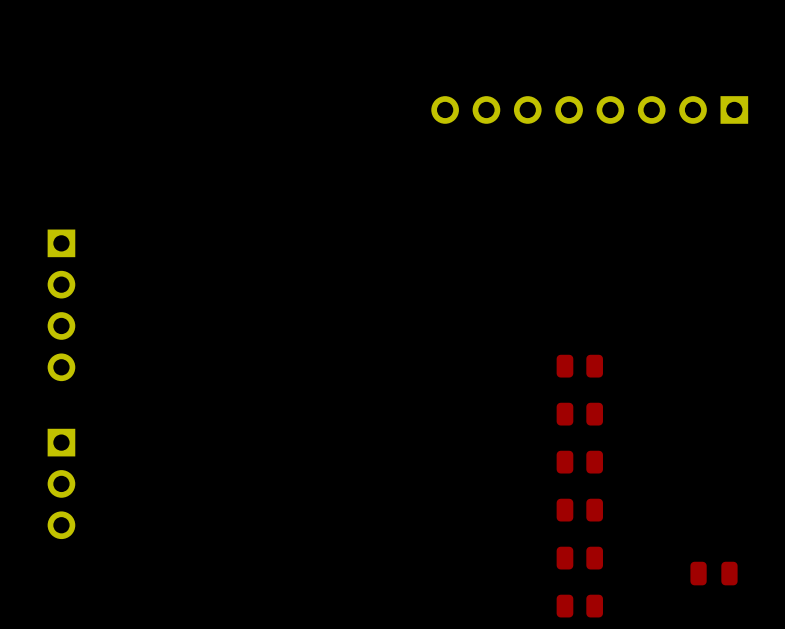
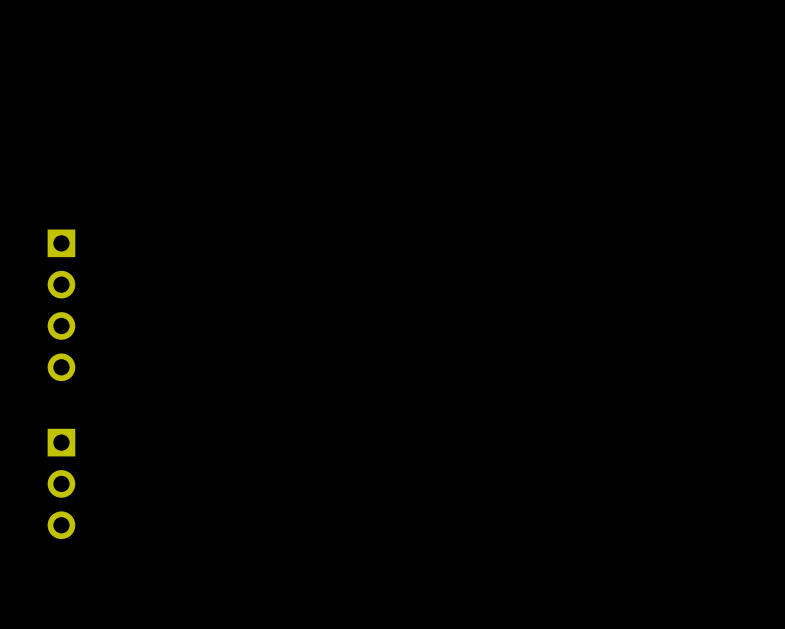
part: (589, 109) -> none
part: (579, 366) -> none
part: (579, 414) -> none
part: (579, 462) -> none
part: (579, 510) -> none
part: (579, 558) -> none
part: (714, 573) -> none
part: (579, 606) -> none

